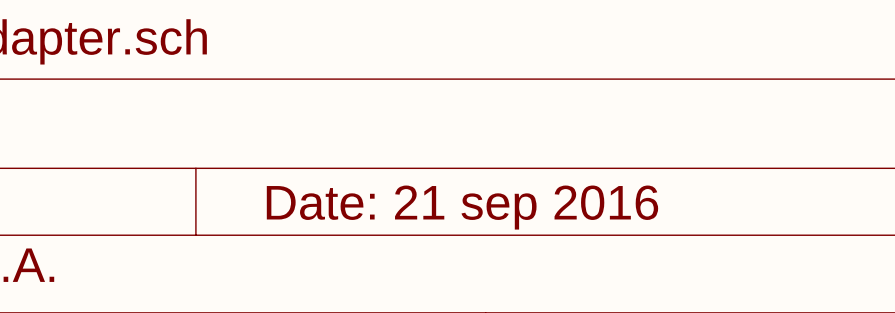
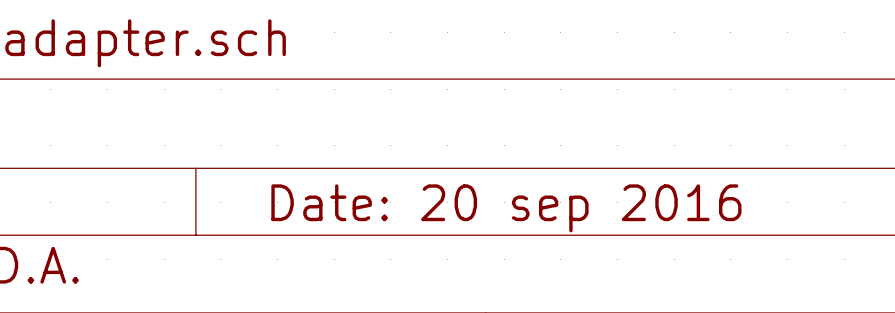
title block: Date: 21 sep 2016 (462, 207) -> Date: 20 sep 2016 (506, 208)

